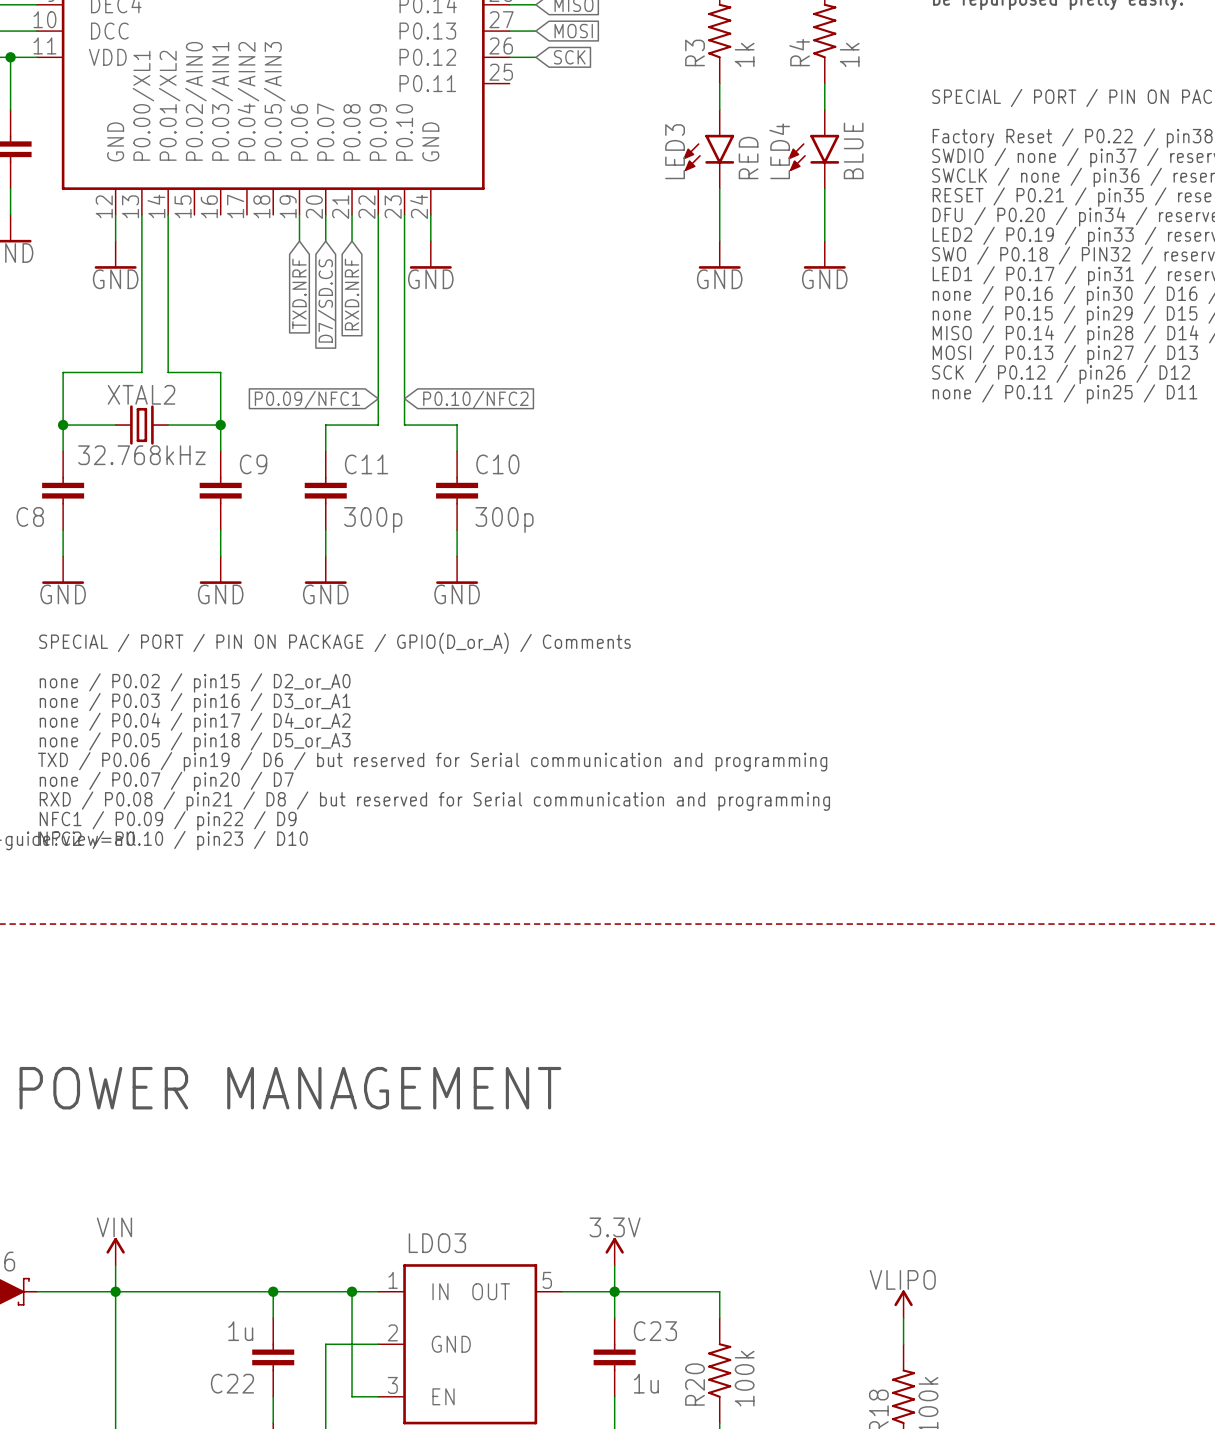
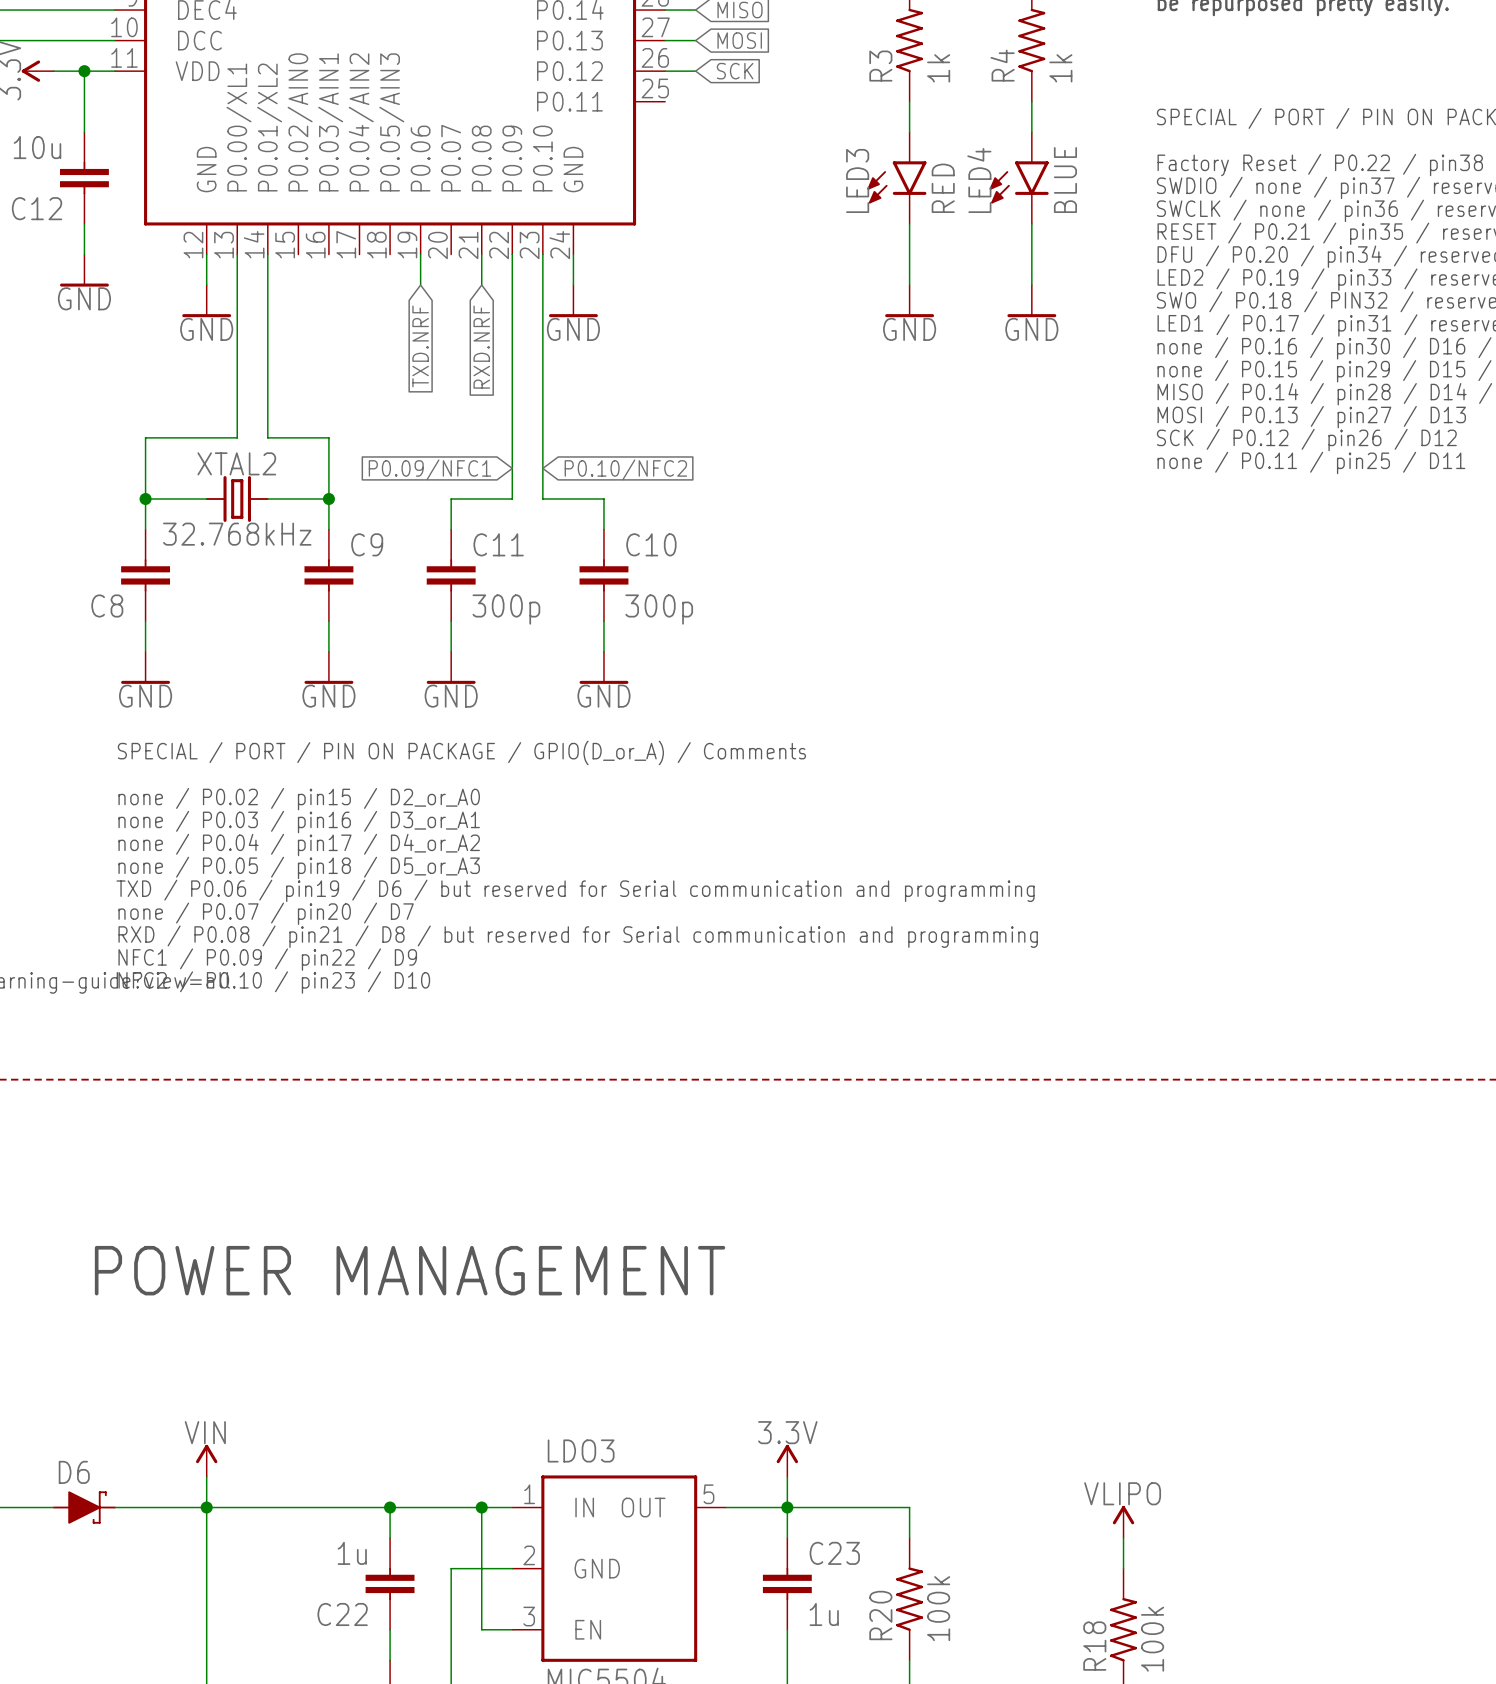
wire: (325, 214) (325, 241) -> none
global label: D7/SD.CS (327, 300) -> none

